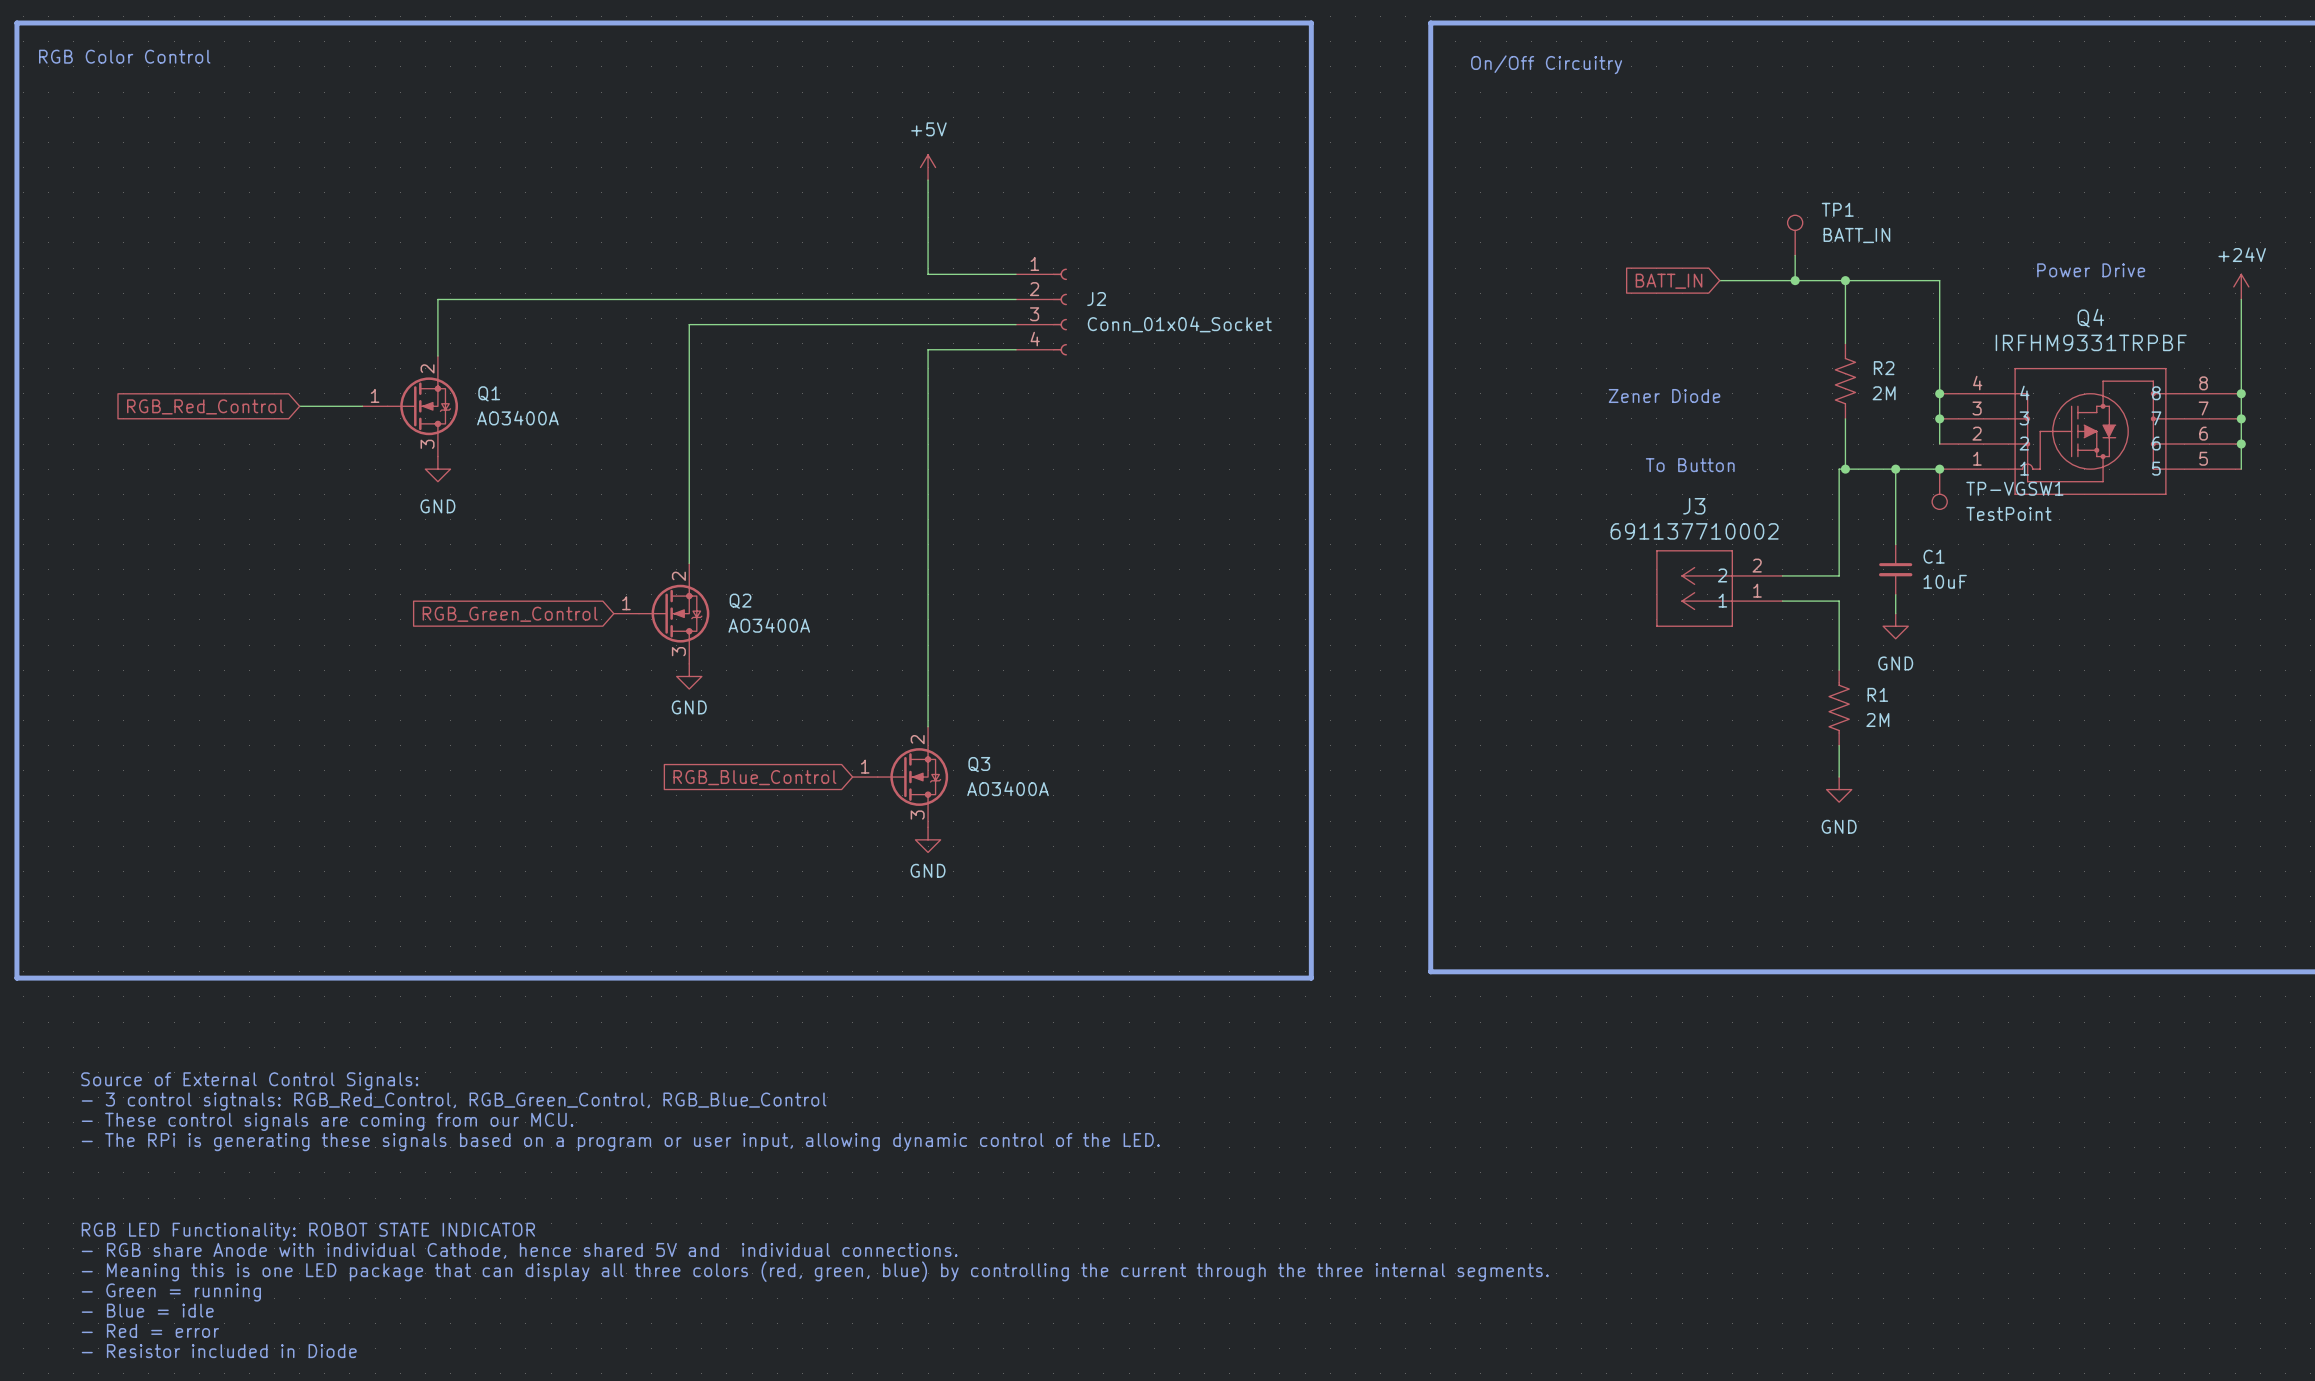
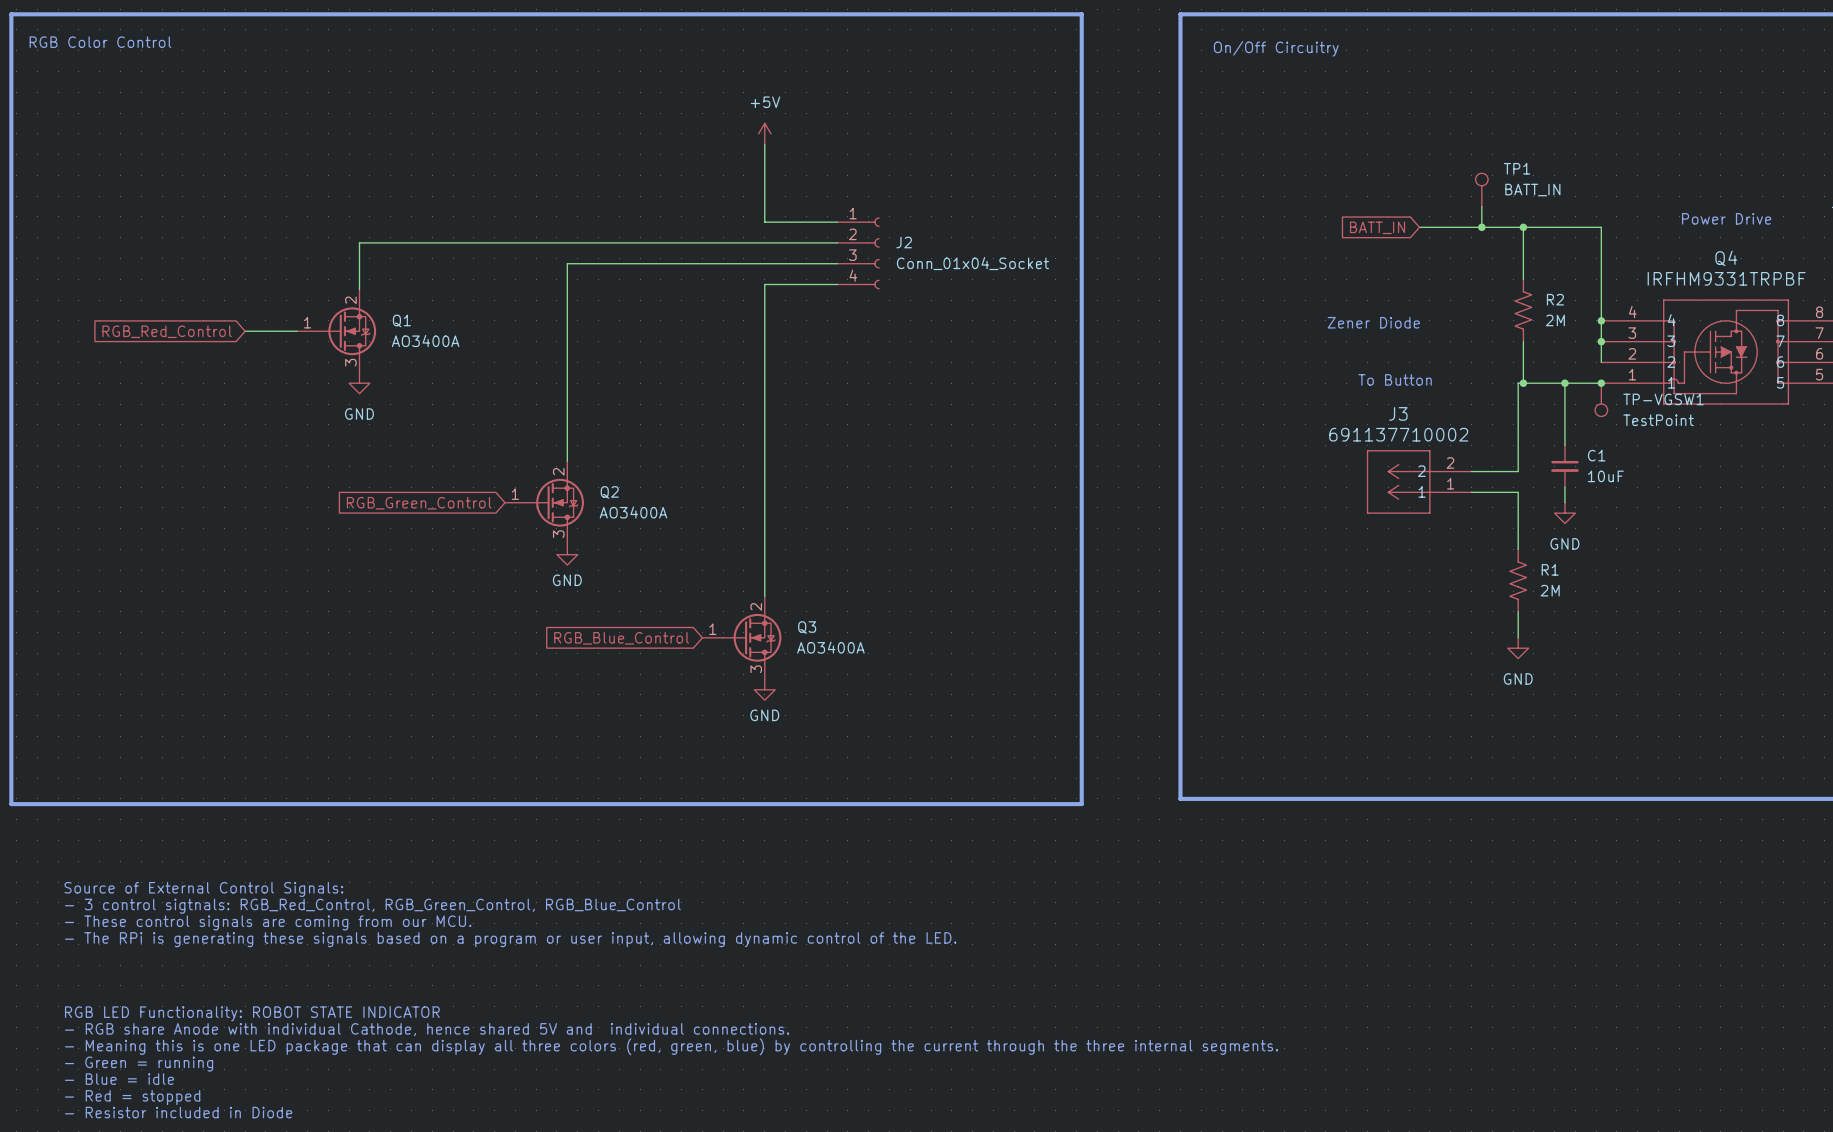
text: - Red = error (150, 1330) -> - Red = stopped (132, 1097)

